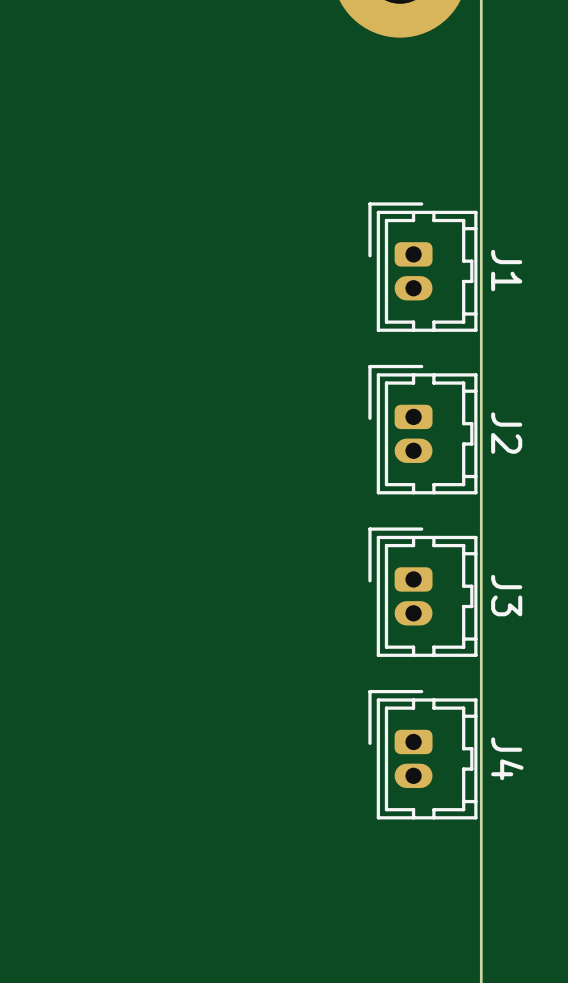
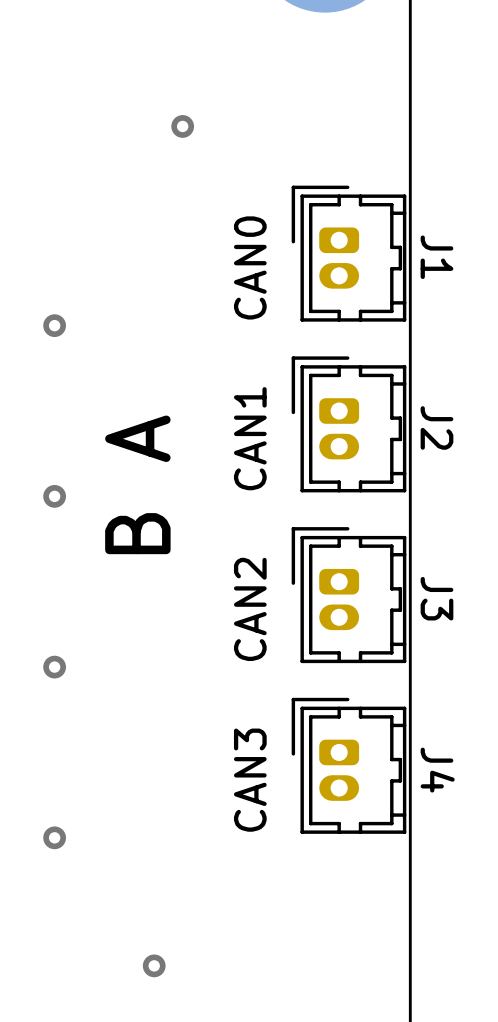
via: none -> (182, 126)
text: none -> CAN0 (250, 267)
via: none -> (54, 325)
text: none -> CAN1 (250, 438)
text: none -> B A (137, 484)
via: none -> (54, 496)
text: none -> CAN2 (250, 609)
via: none -> (54, 667)
text: none -> CAN3 (250, 780)
via: none -> (54, 837)
via: none -> (154, 965)

